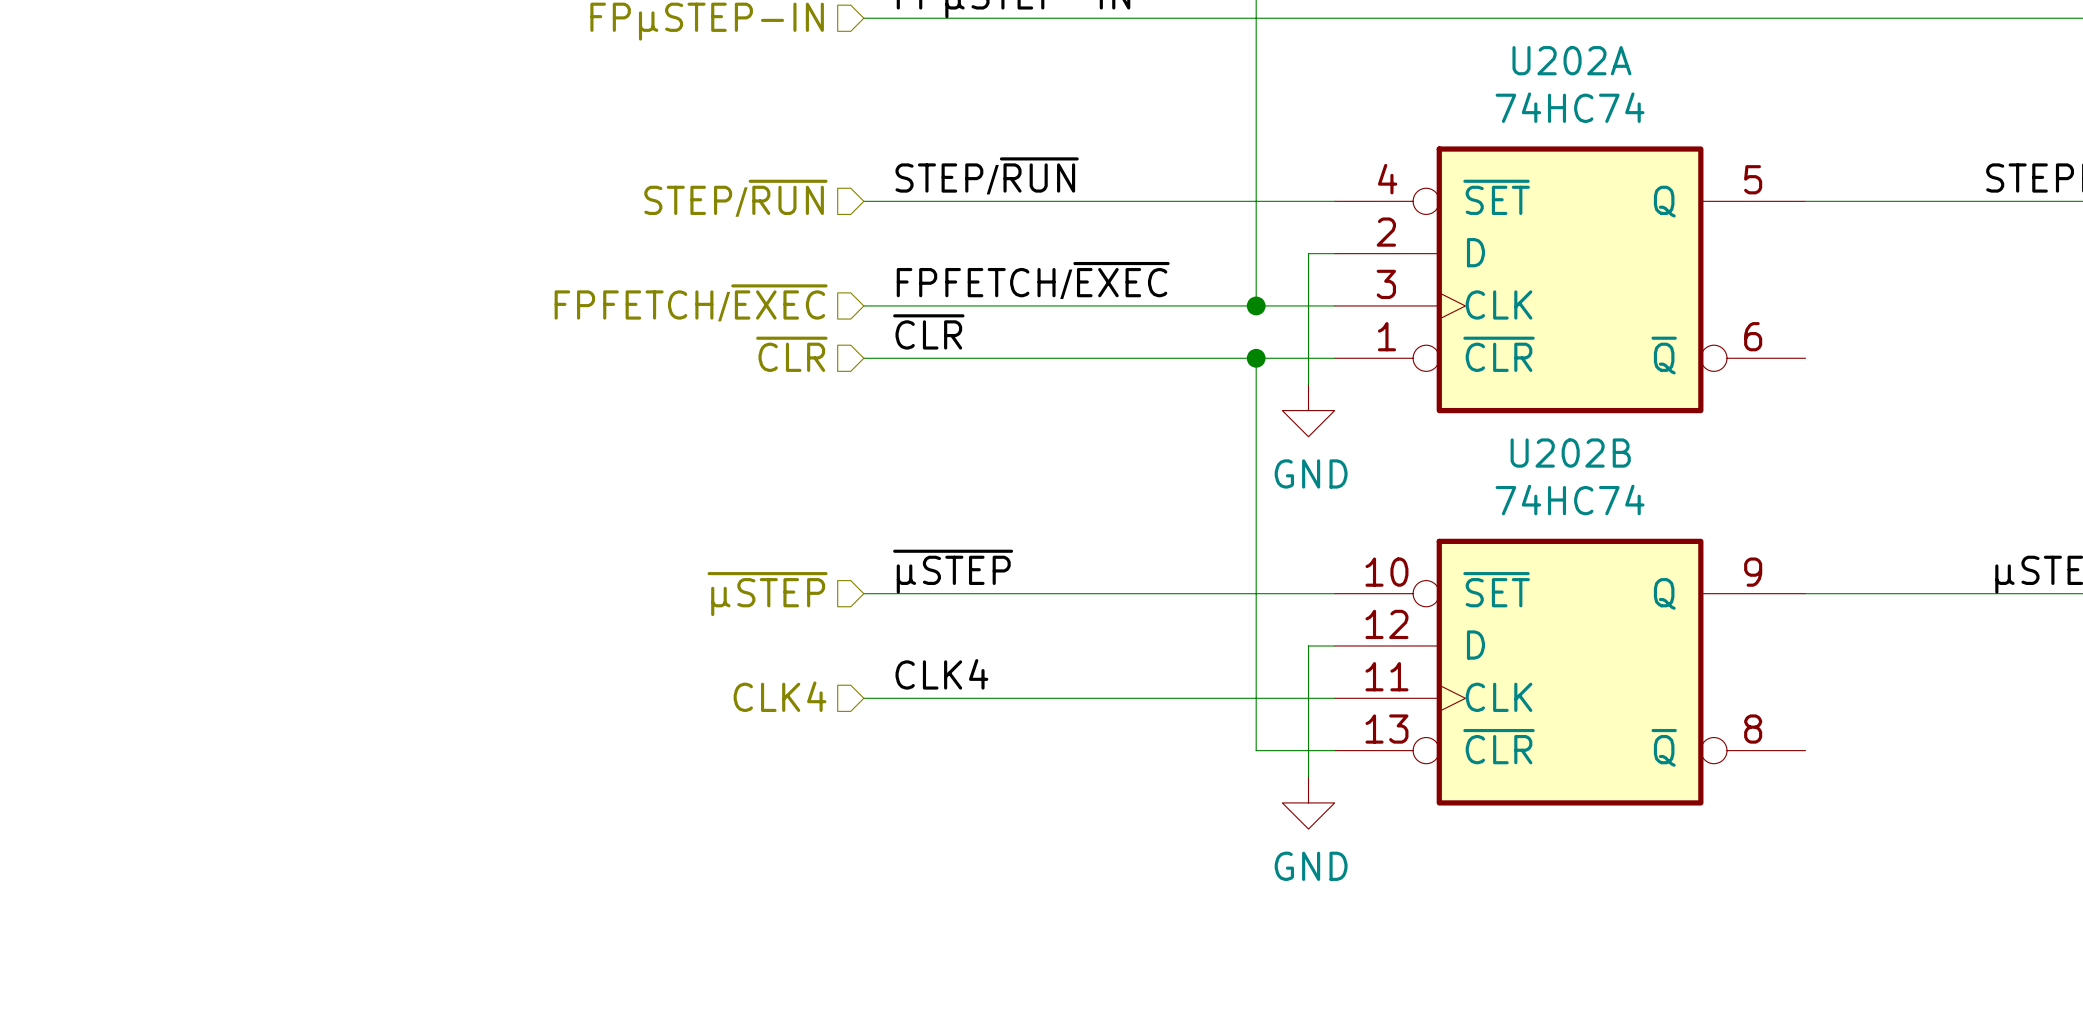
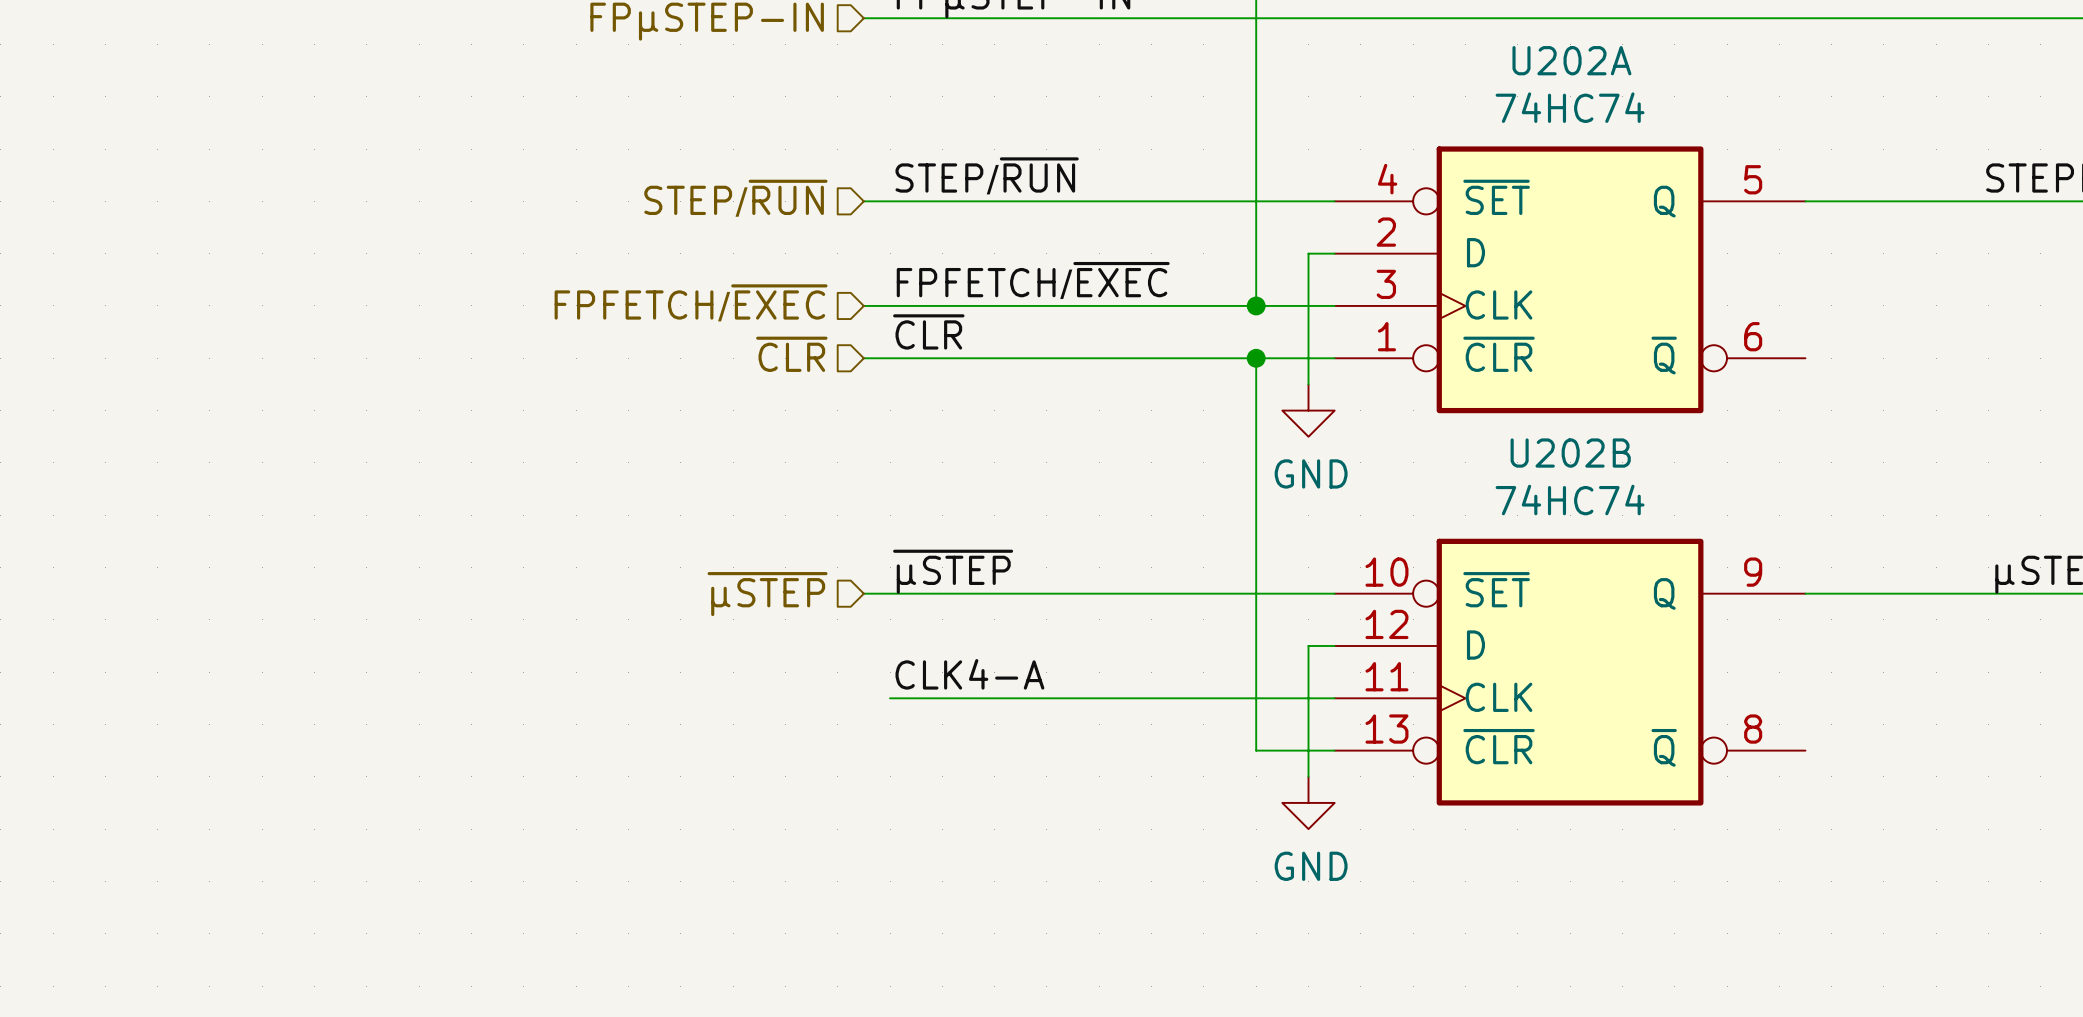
label: CLK4 (941, 674) -> CLK4-A (969, 674)
hierarchical label: CLK4 (780, 696) -> none
wire: (863, 698) (890, 698) -> none

